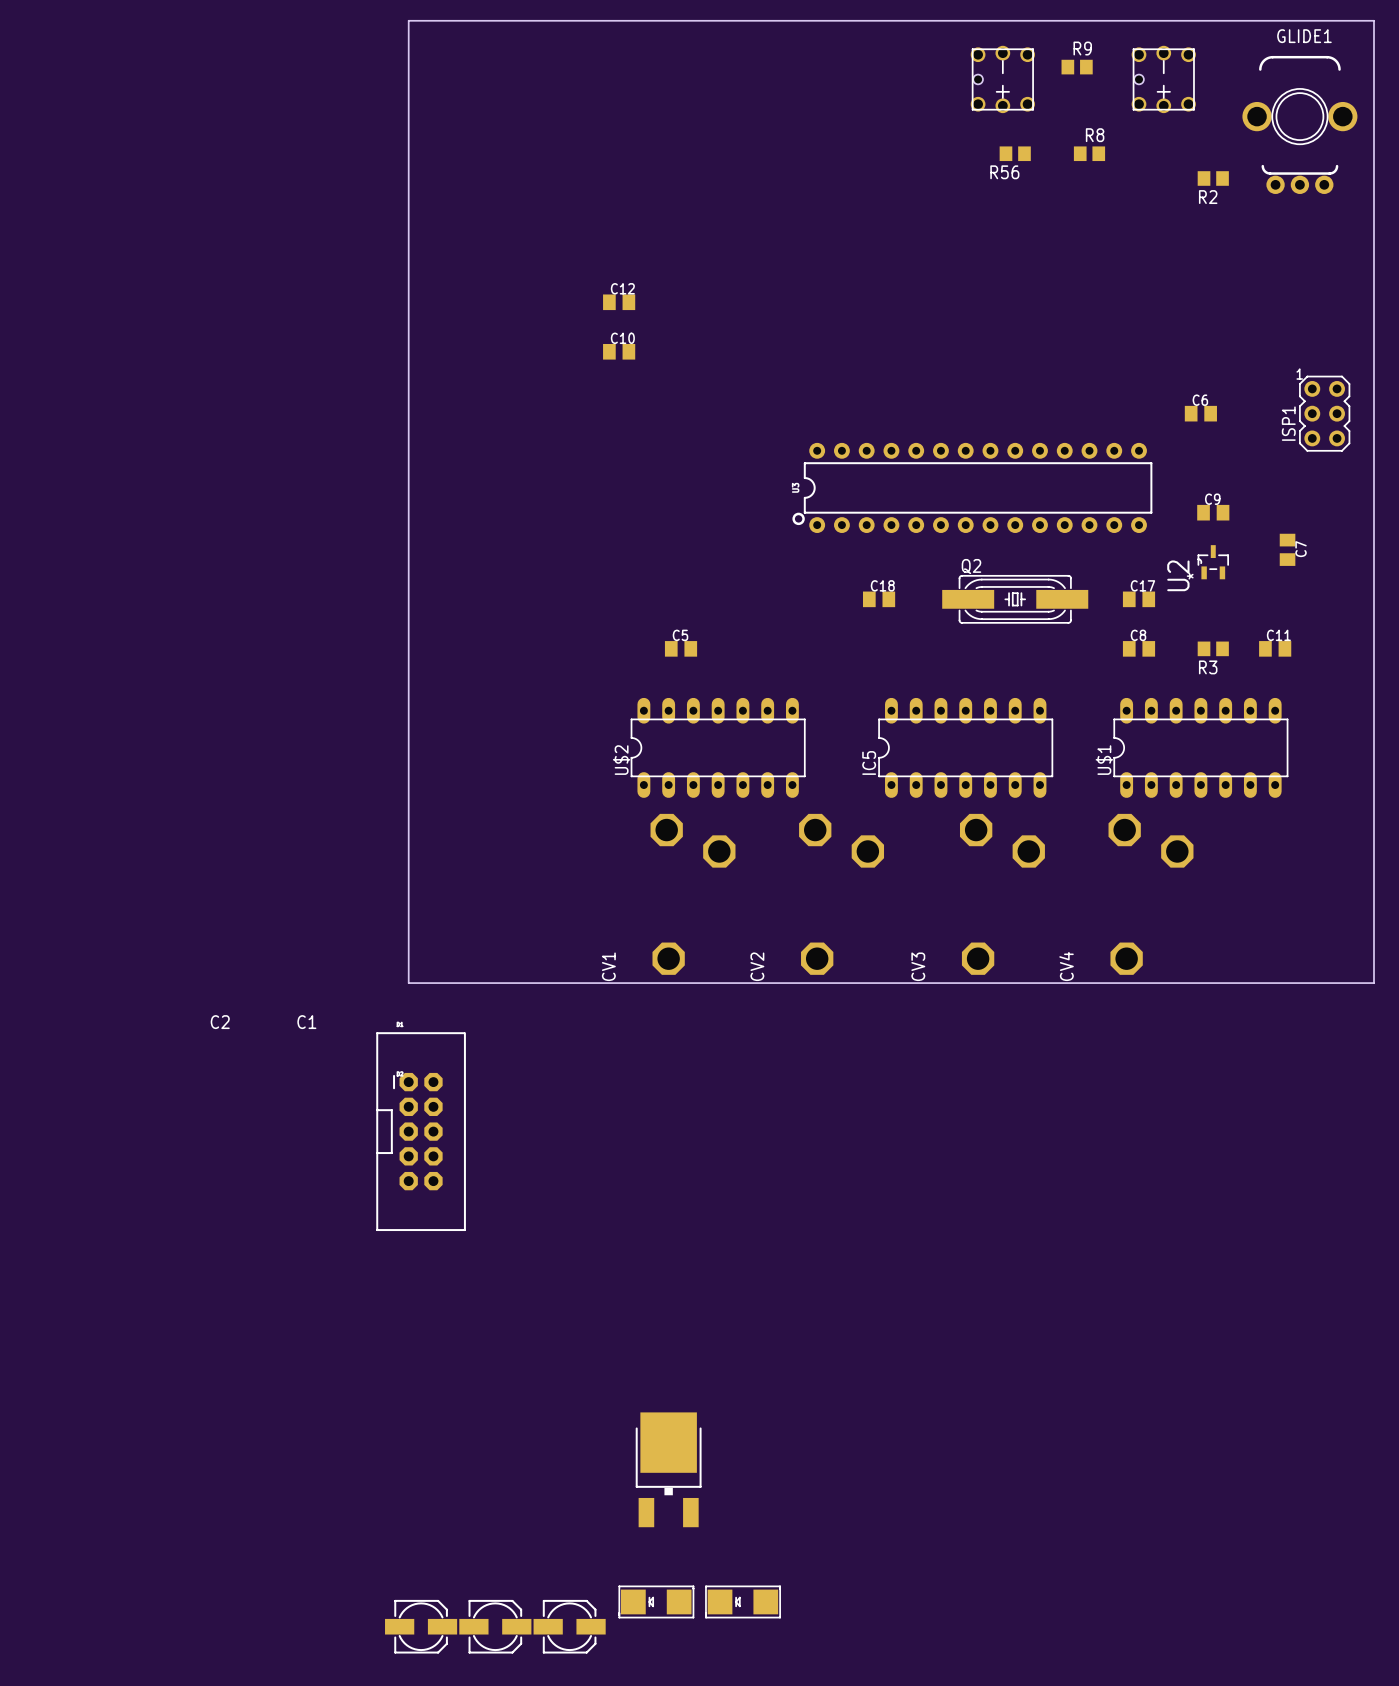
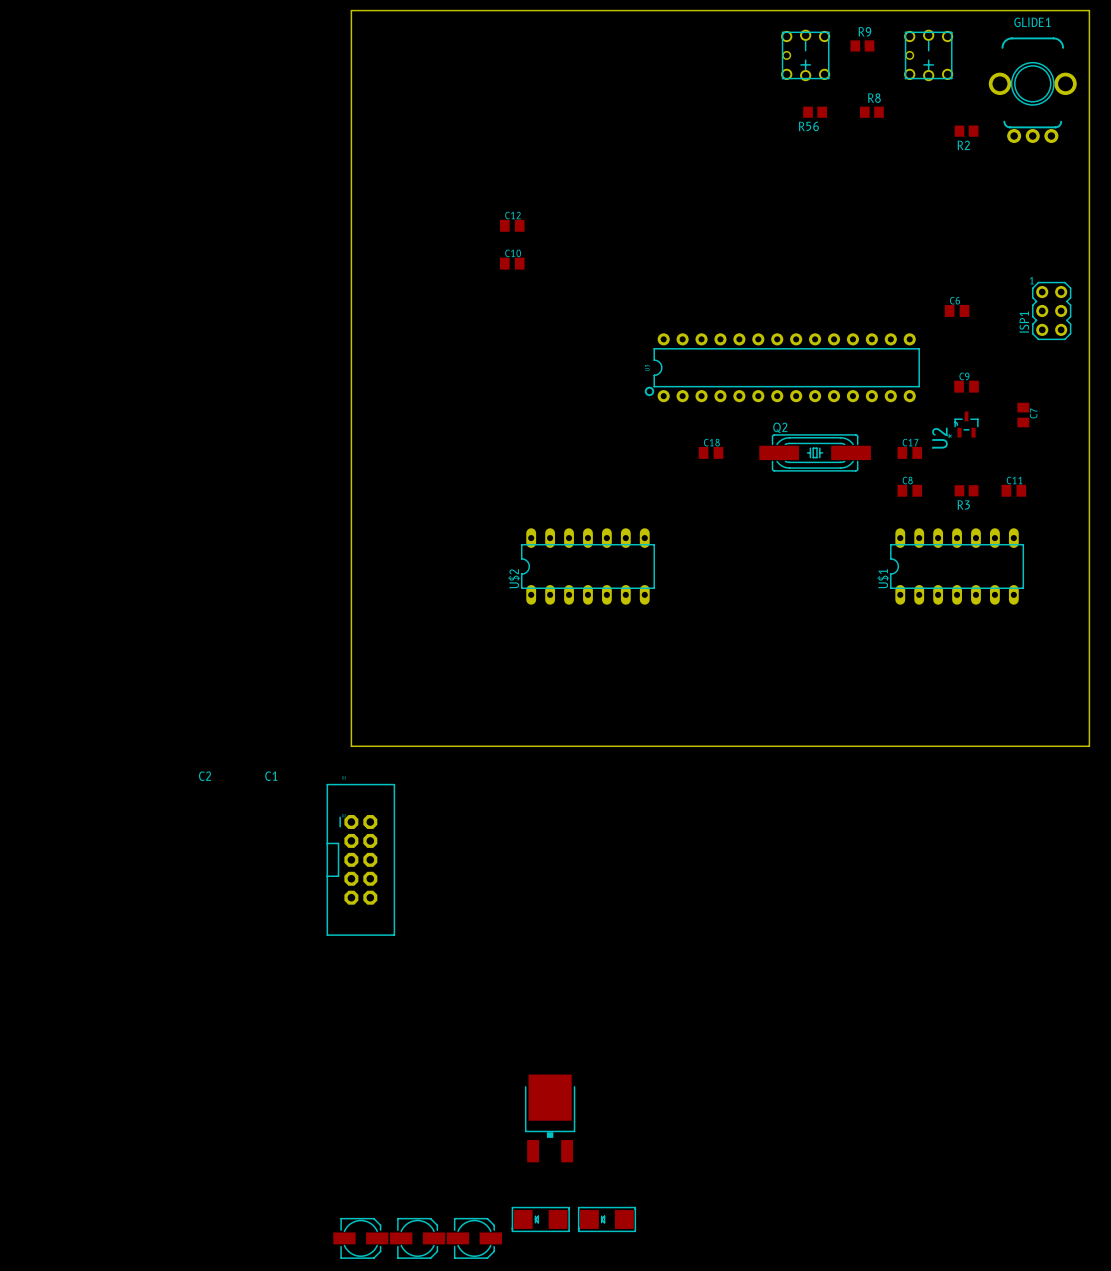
C5: (681, 648) -> none
IC5: (965, 747) -> none
CV1: (693, 894) -> none
CV2: (841, 894) -> none
CV3: (1002, 894) -> none
CV4: (1151, 894) -> none

